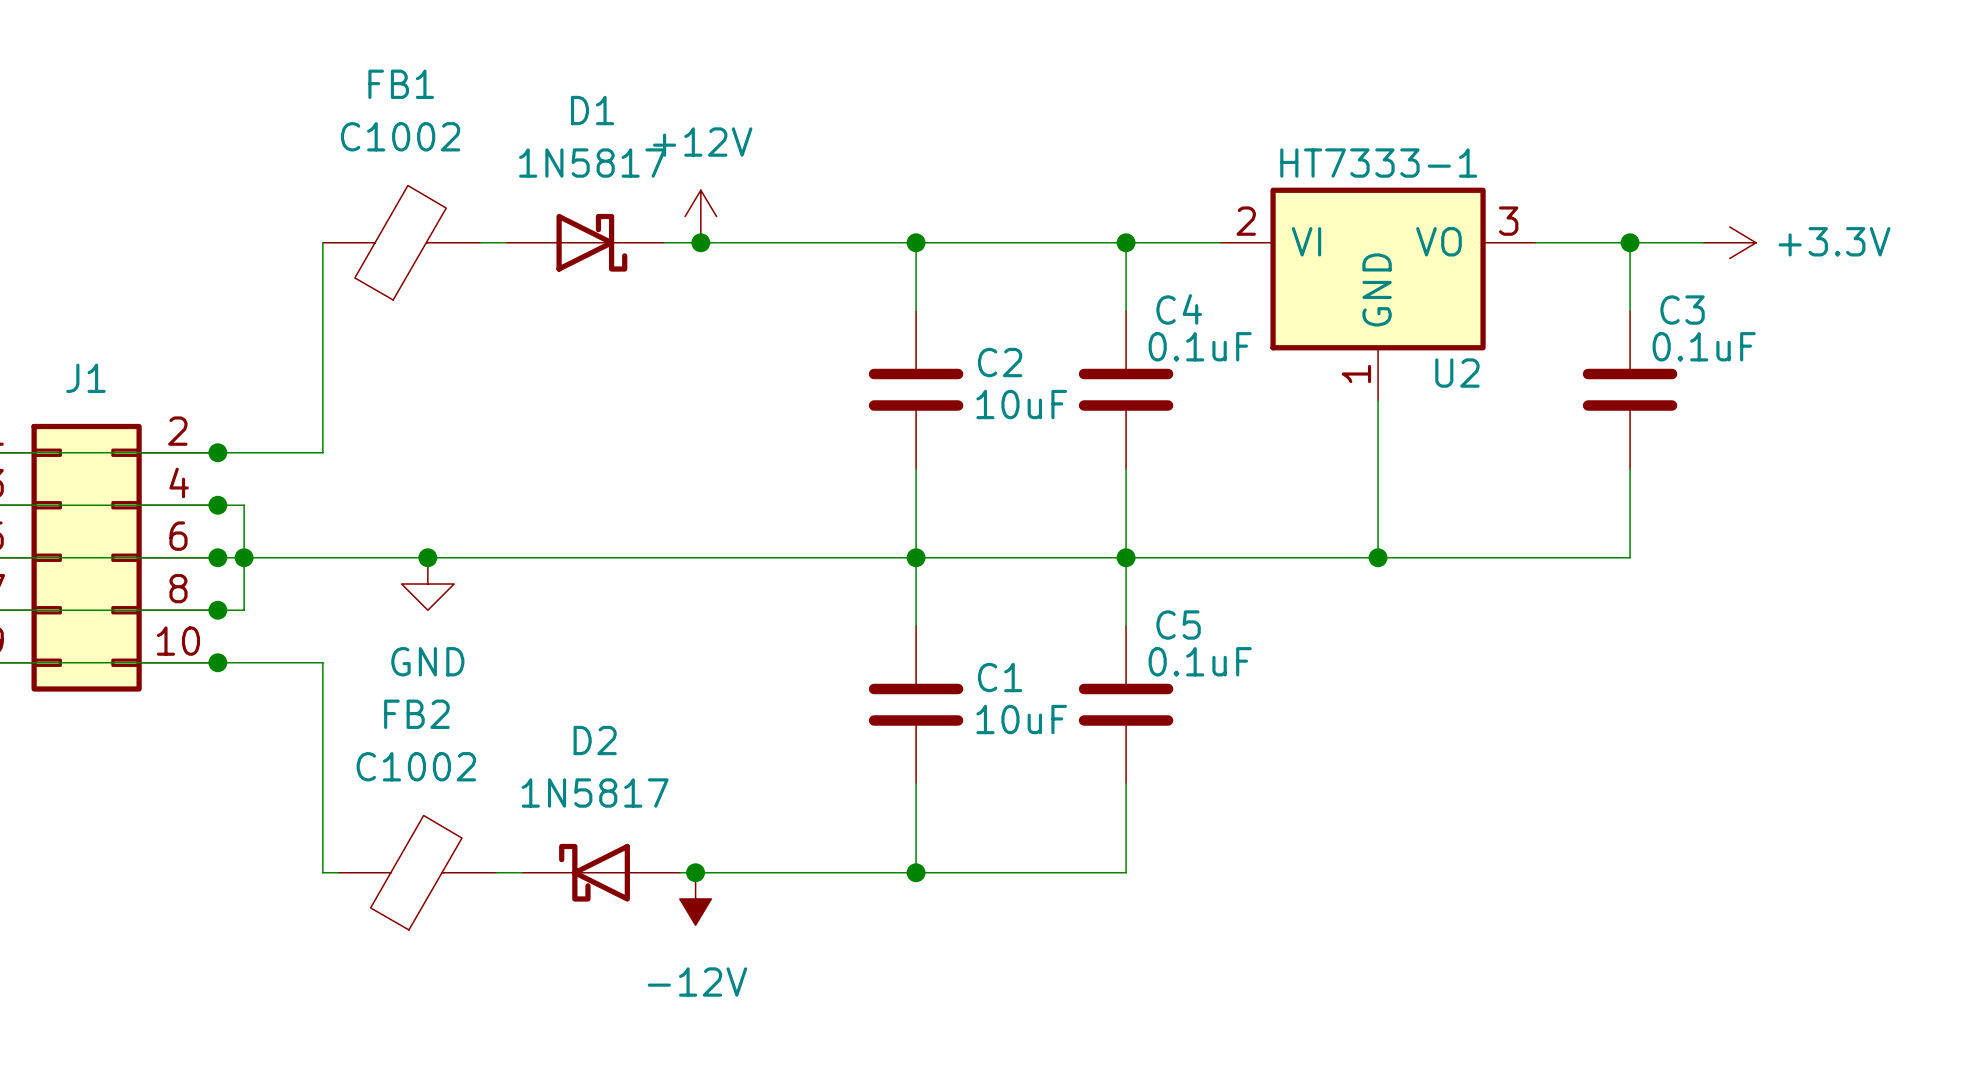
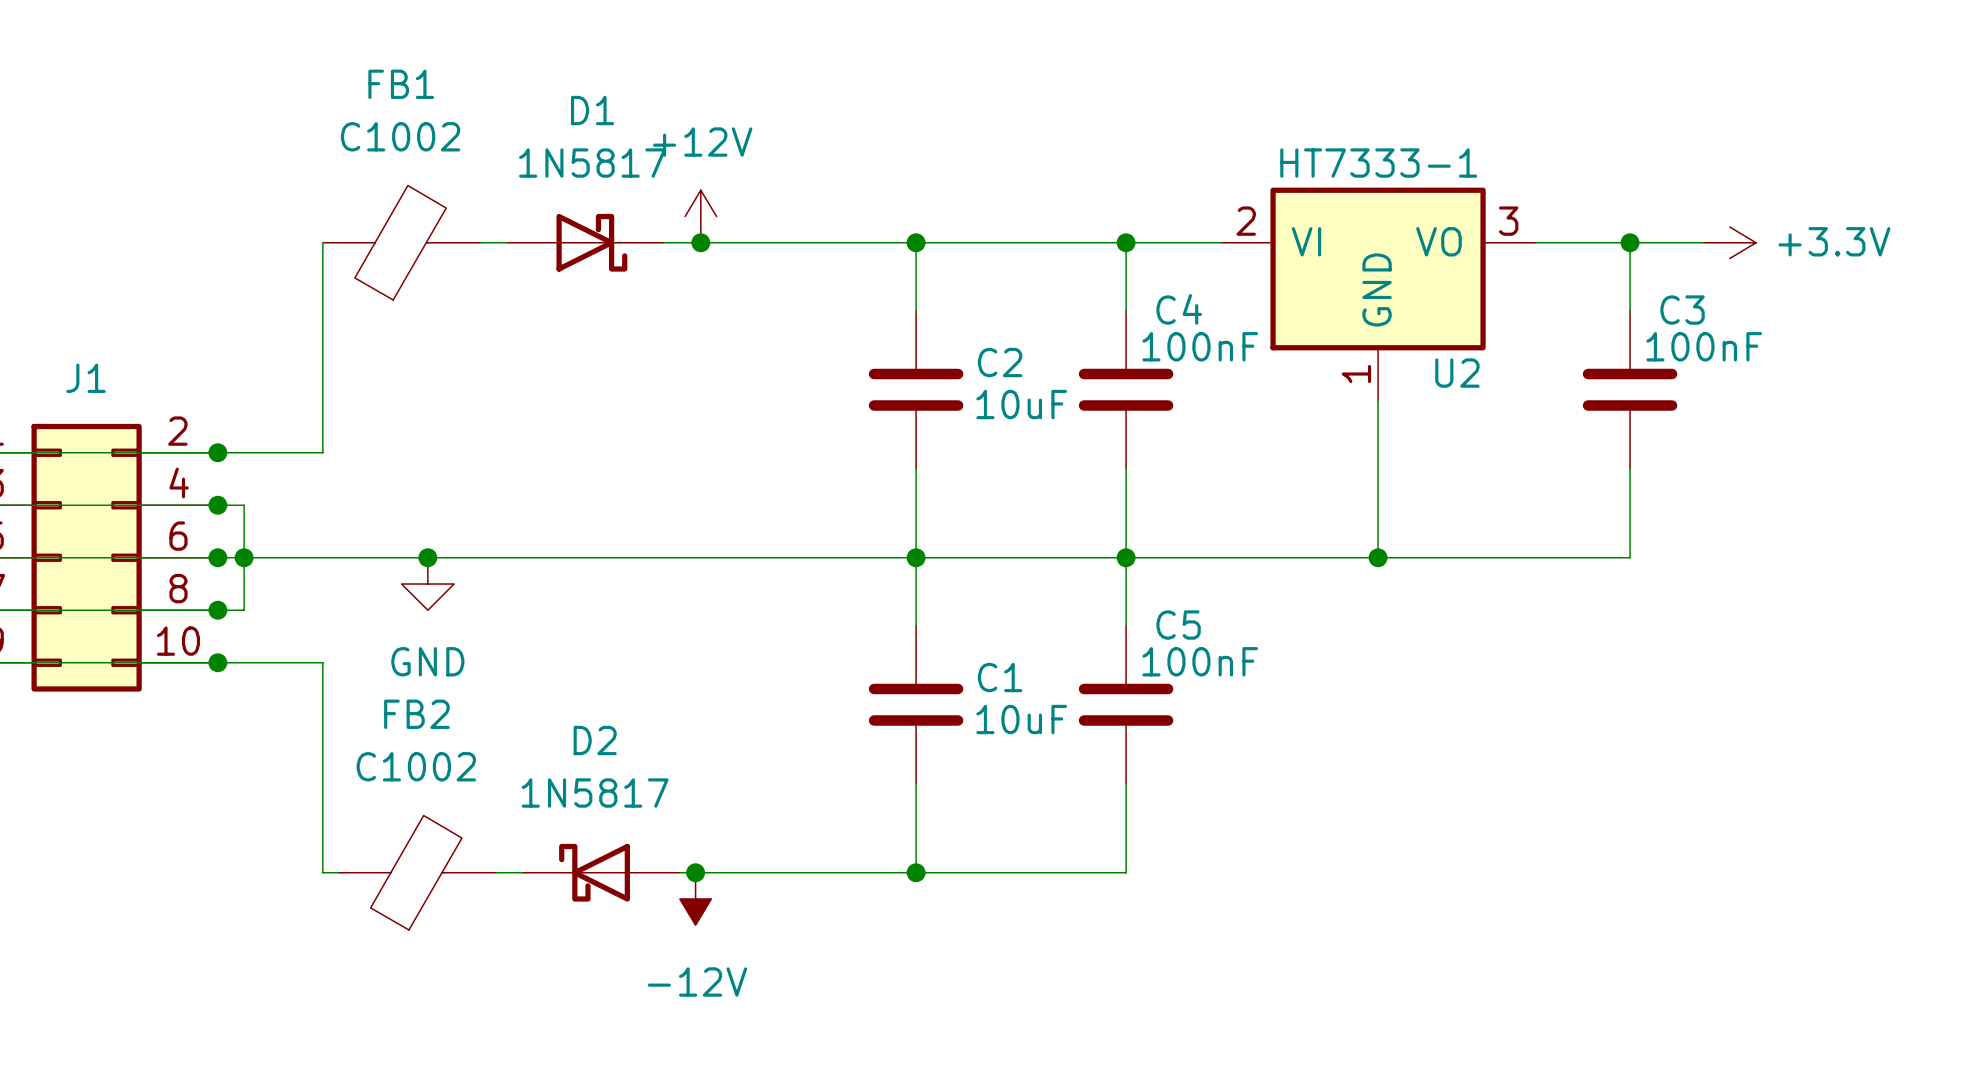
C4 value: 0.1uF (1200, 346) -> 100nF (1200, 346)
C3 value: 0.1uF (1704, 346) -> 100nF (1704, 346)
C5 value: 0.1uF (1200, 661) -> 100nF (1200, 661)

